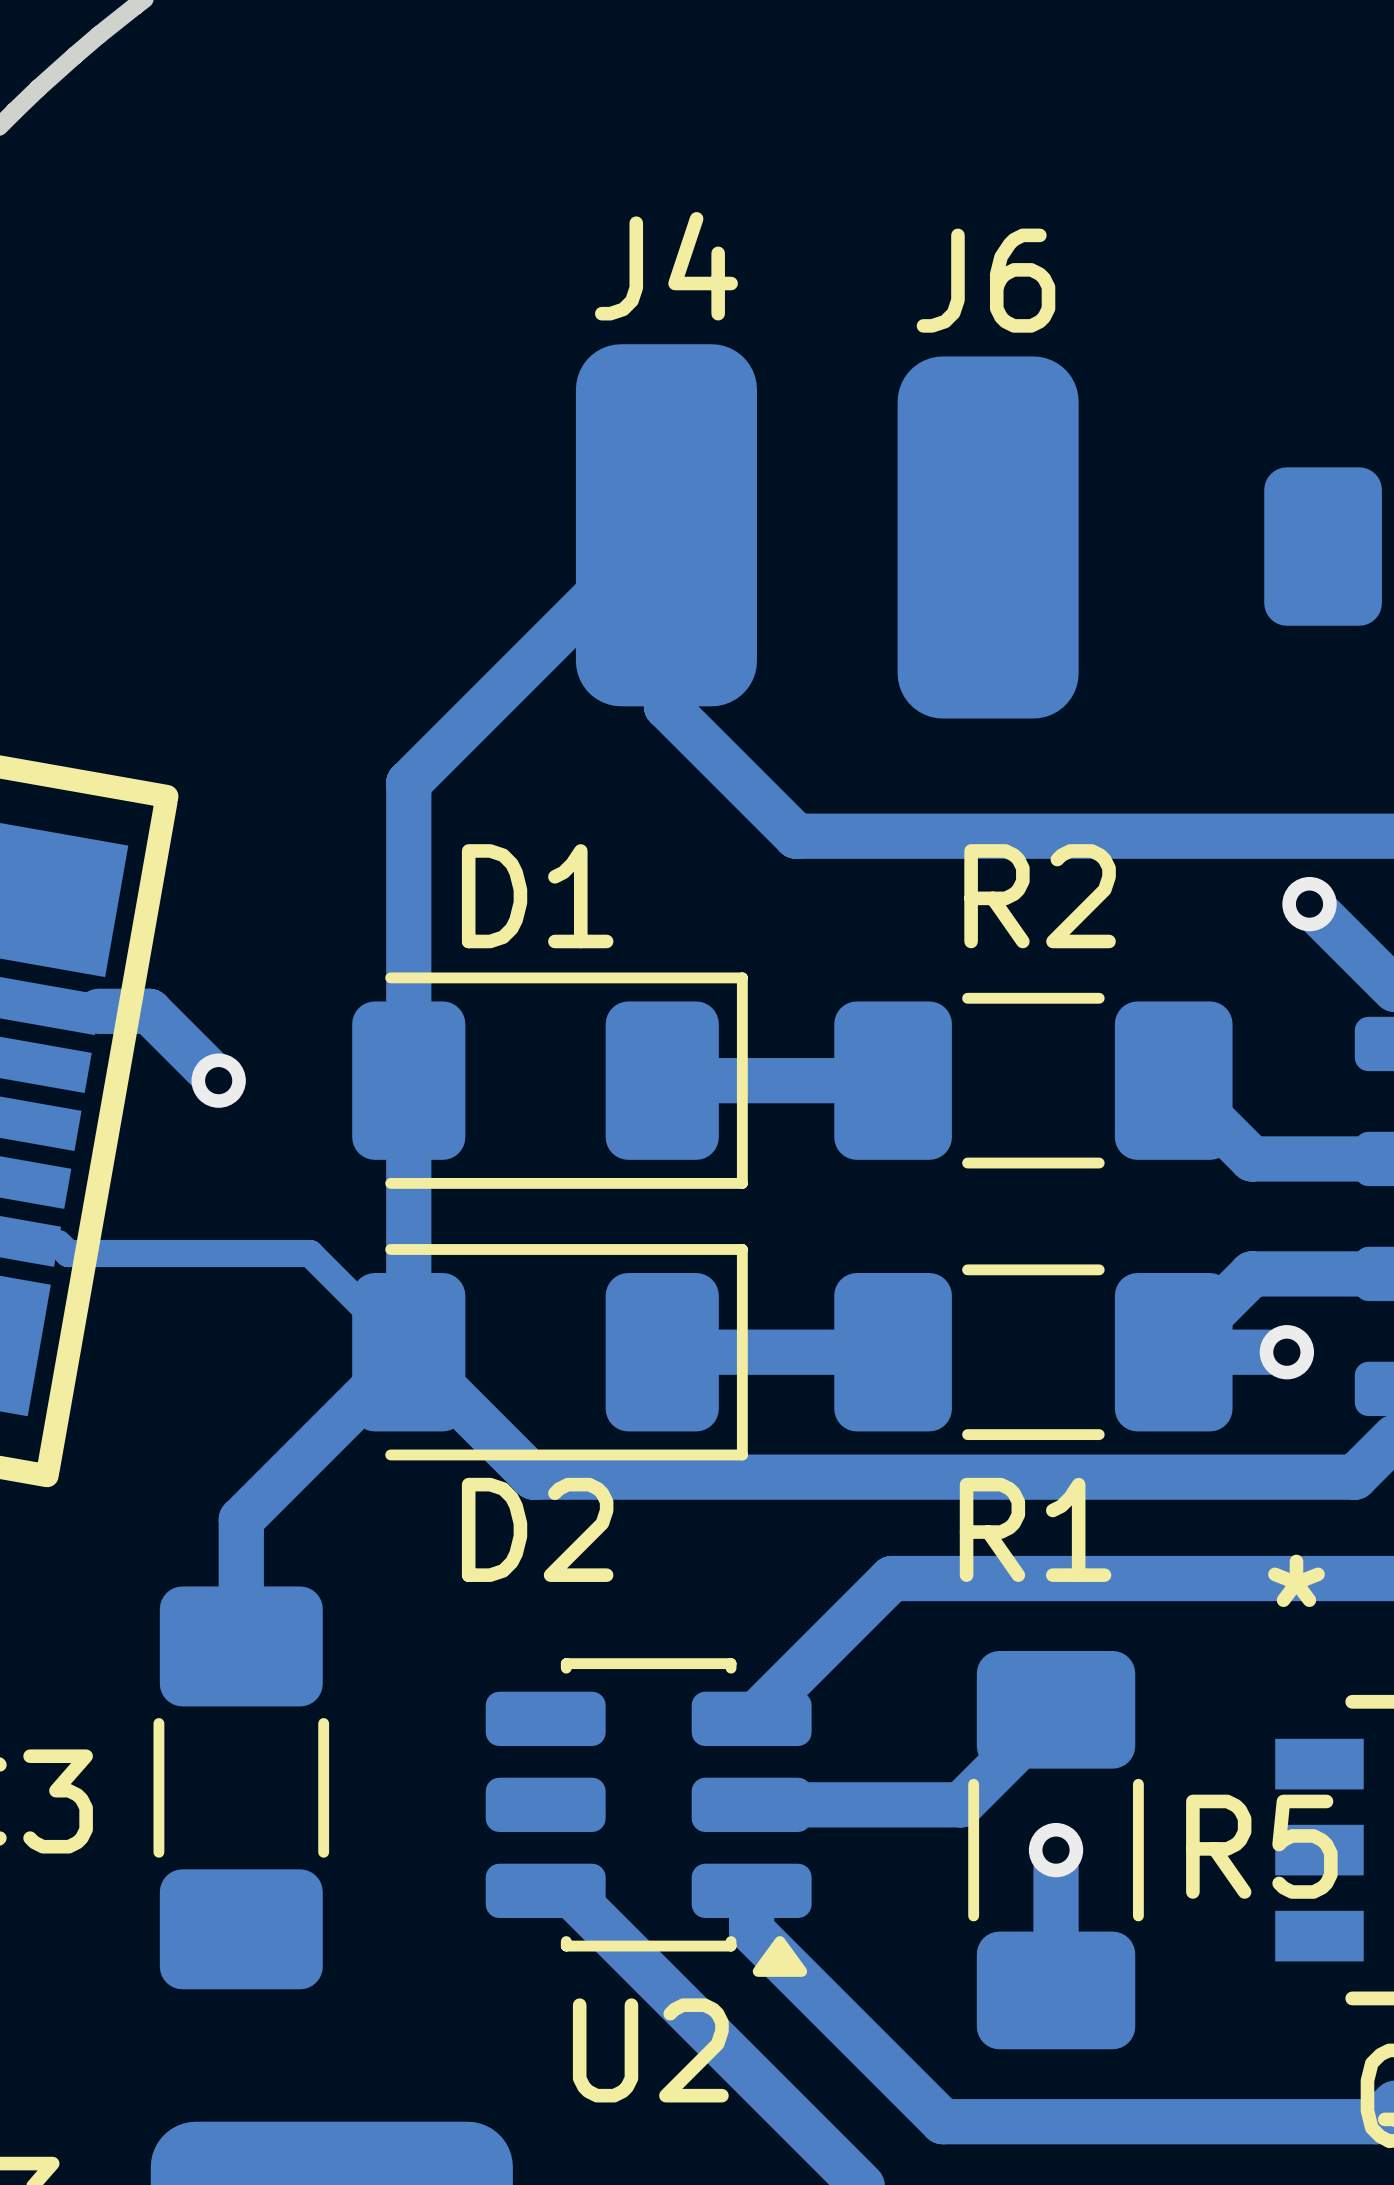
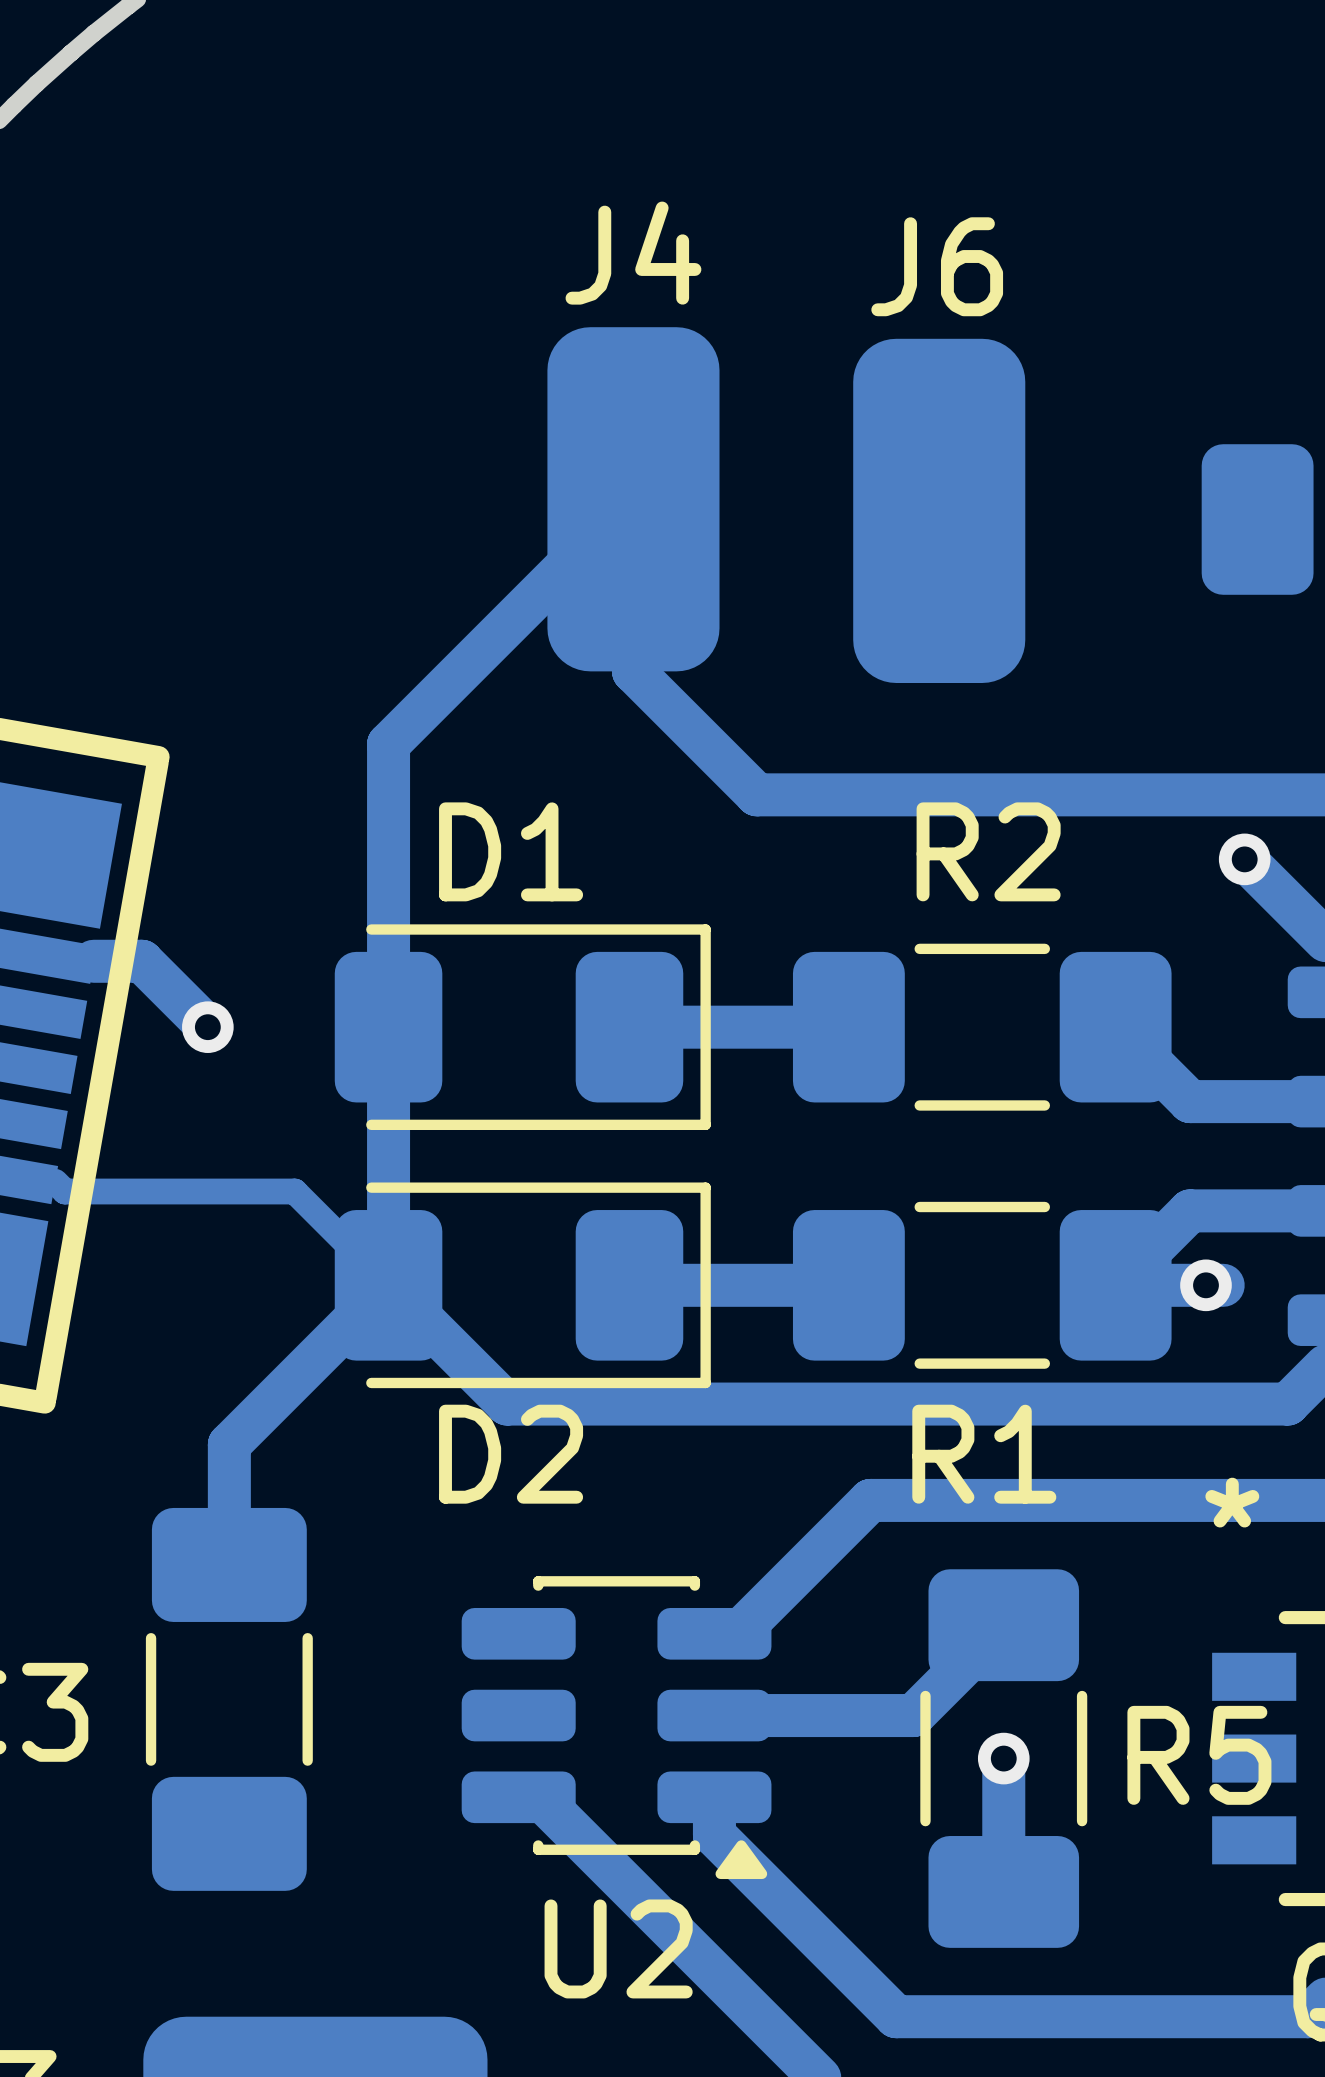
via position: (1286, 1352) -> (1205, 1285)
track: (915, 1578) (891, 1578) (751, 1718) -> (870, 1500) (737, 1633) (714, 1633)

